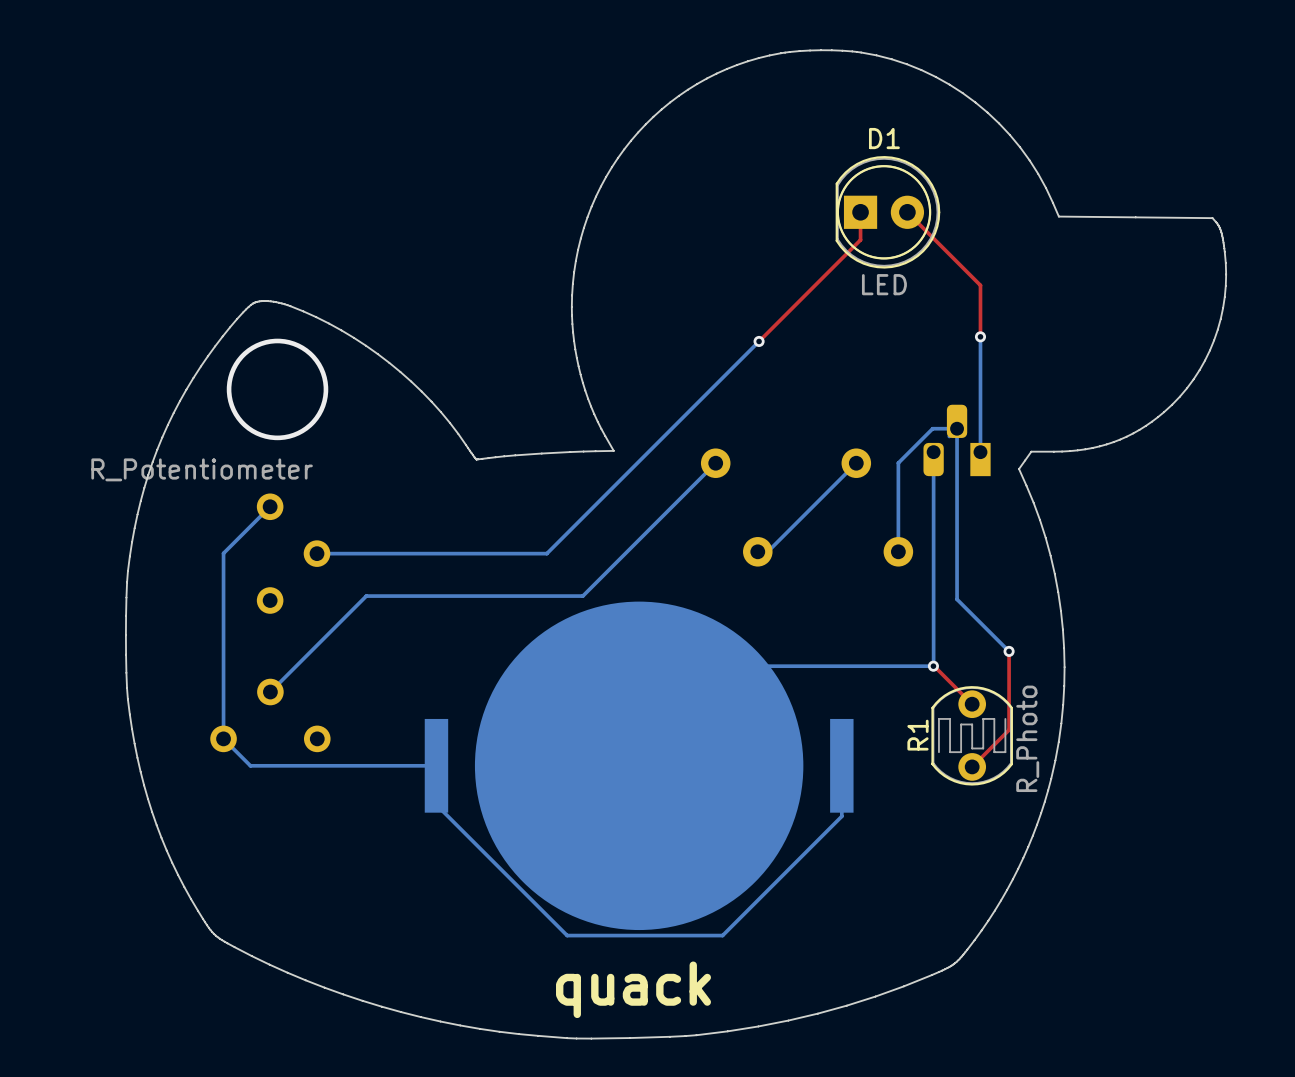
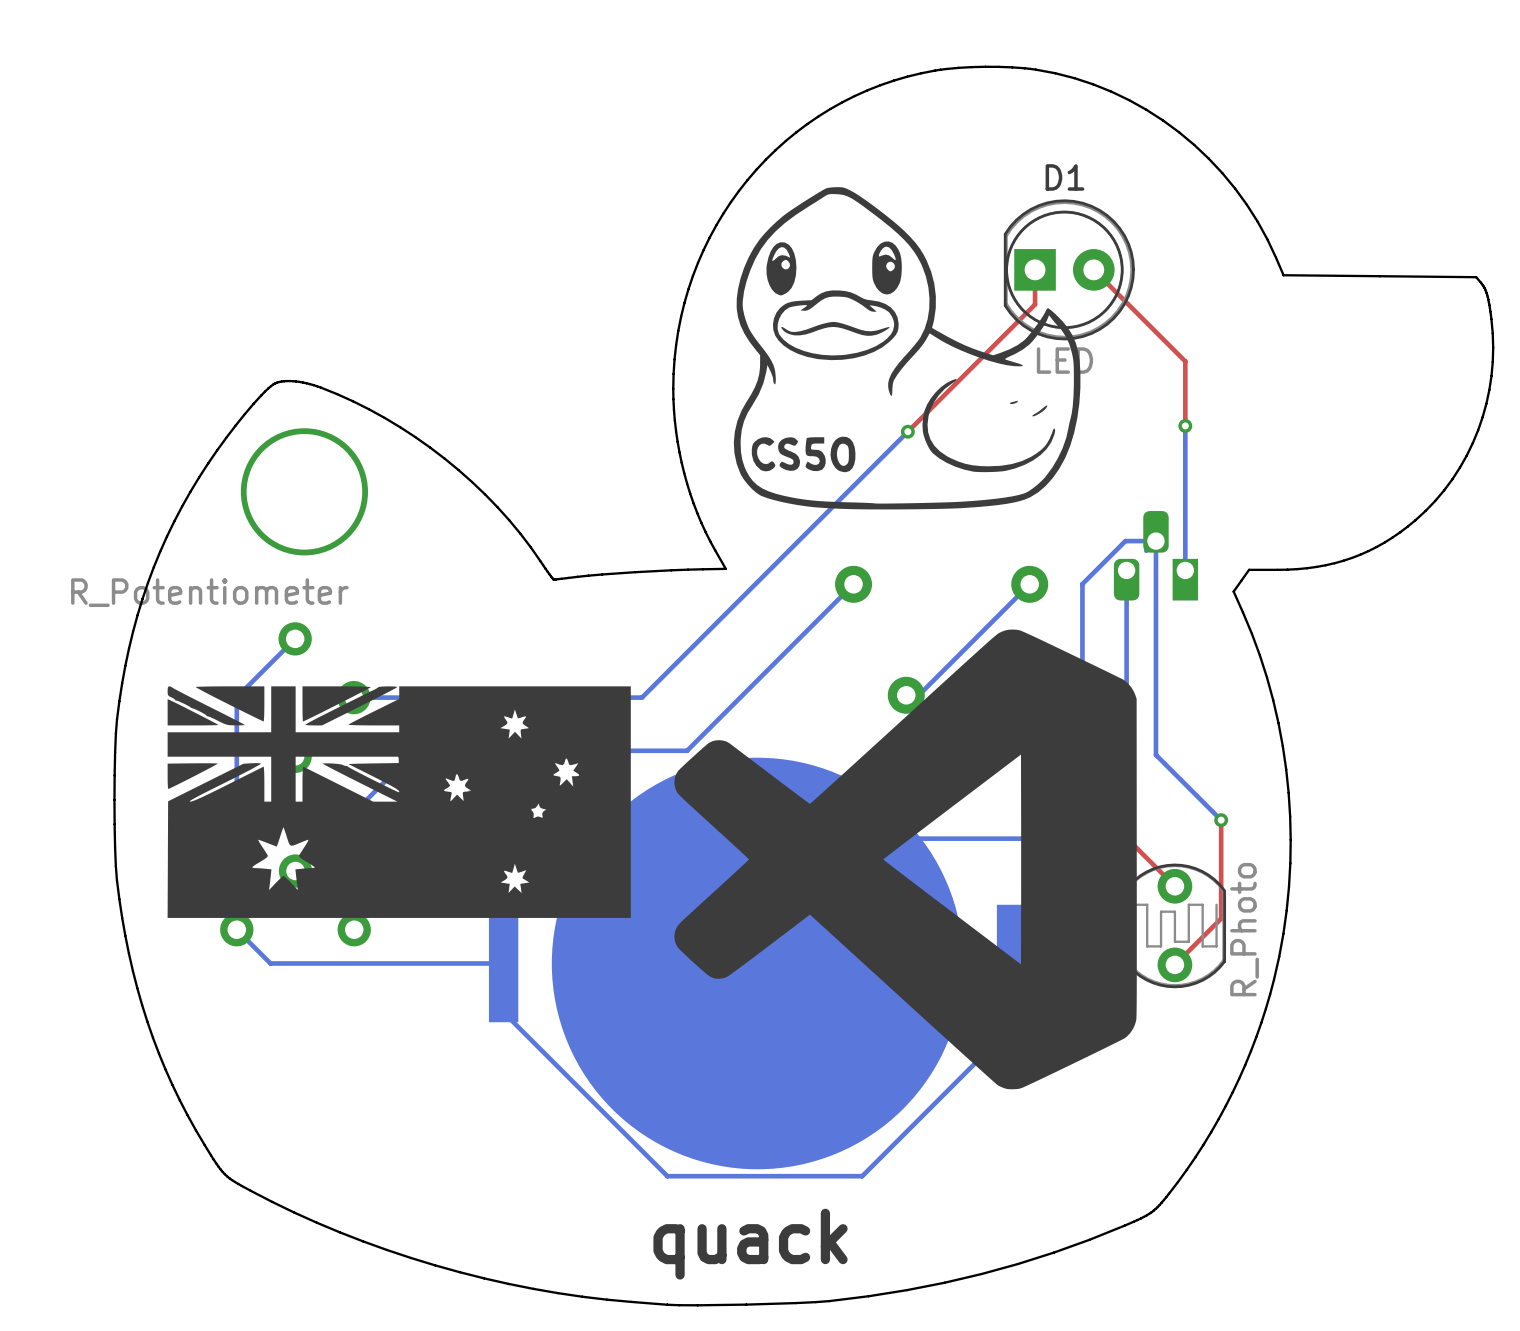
drawing: none -> [733, 187, 1081, 510]
drawing: none -> [674, 629, 1137, 1090]
drawing: none -> [167, 686, 631, 918]

